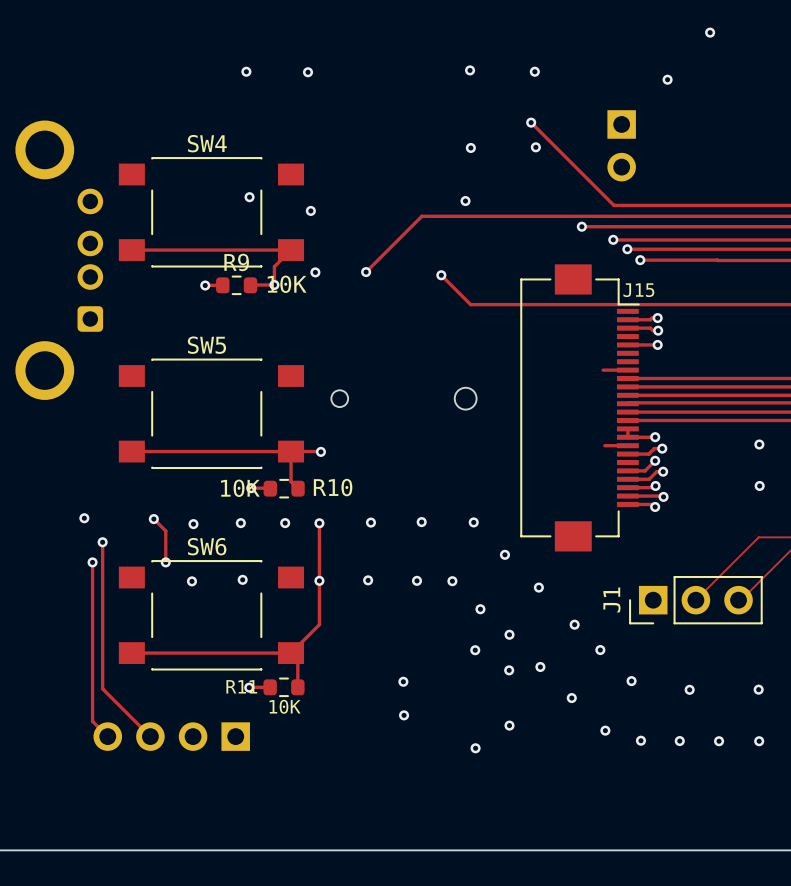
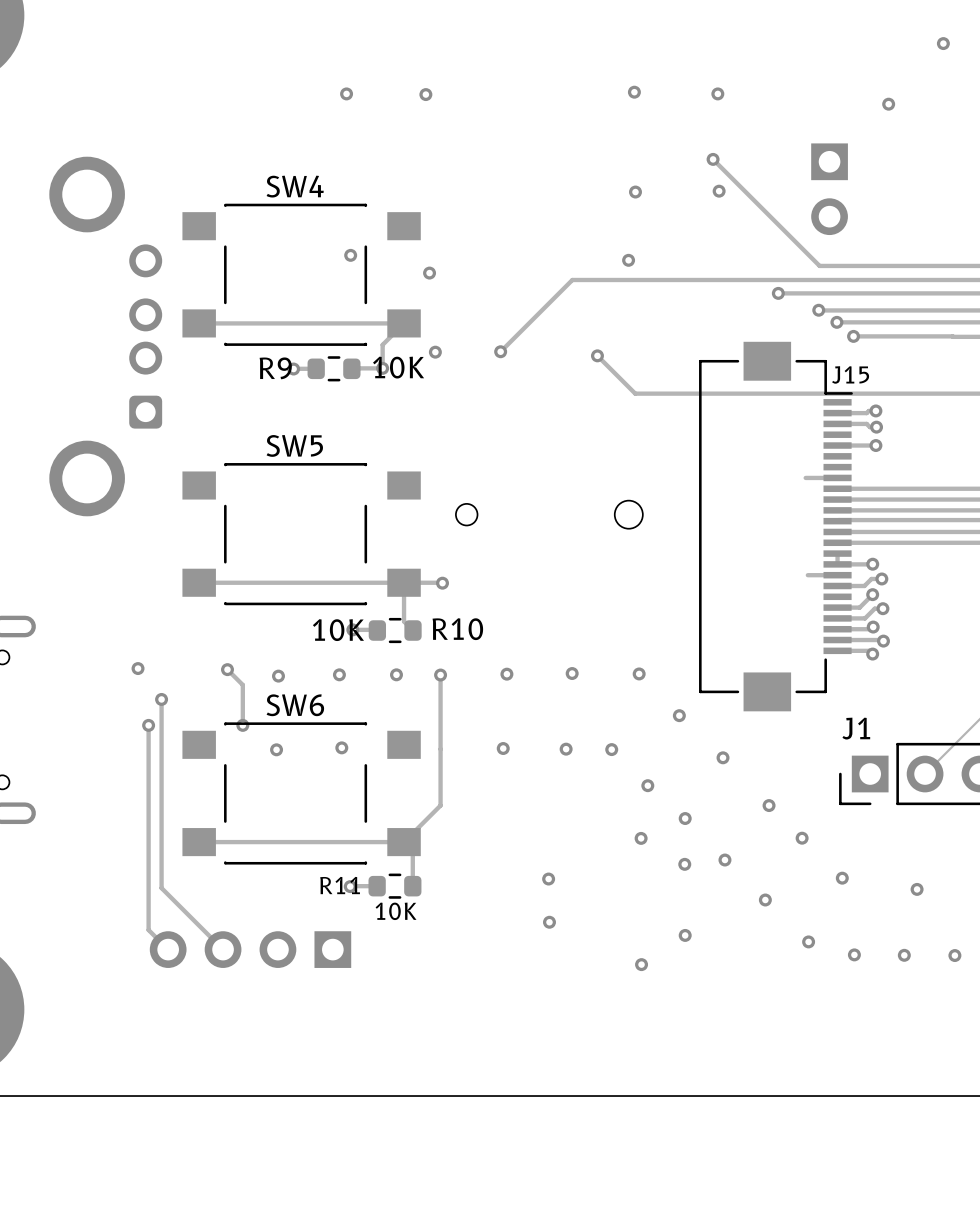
R9 name position: R9 (236, 262) -> R9 (275, 368)
via: (319, 580) -> none
J1 name rotation: 0° (611, 600) -> 90° clockwise (856, 728)
J1 name position: J1 (611, 600) -> J1 (856, 728)

